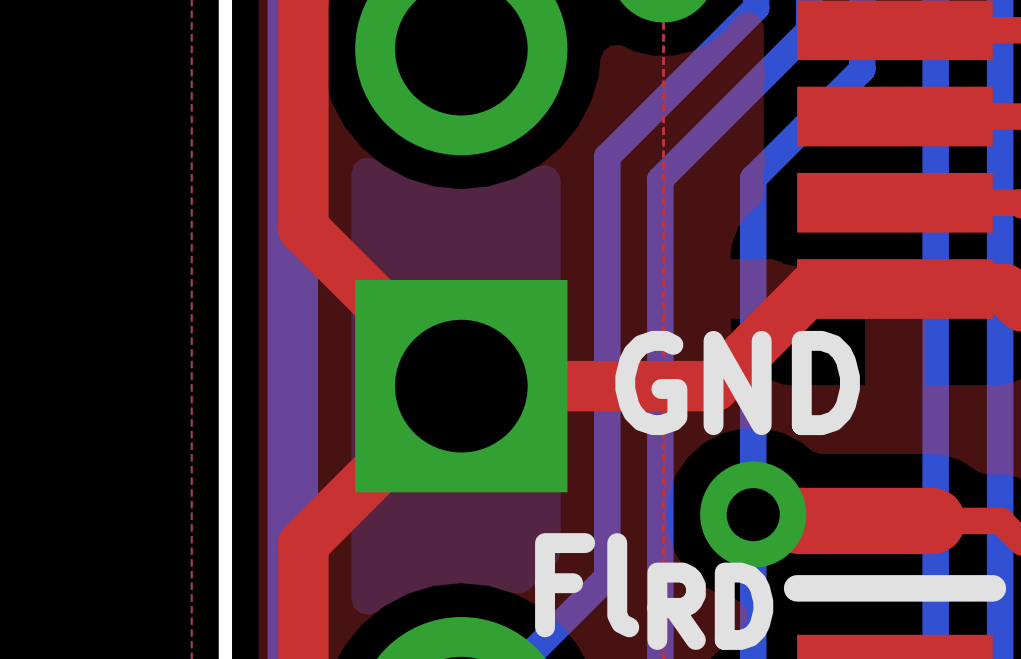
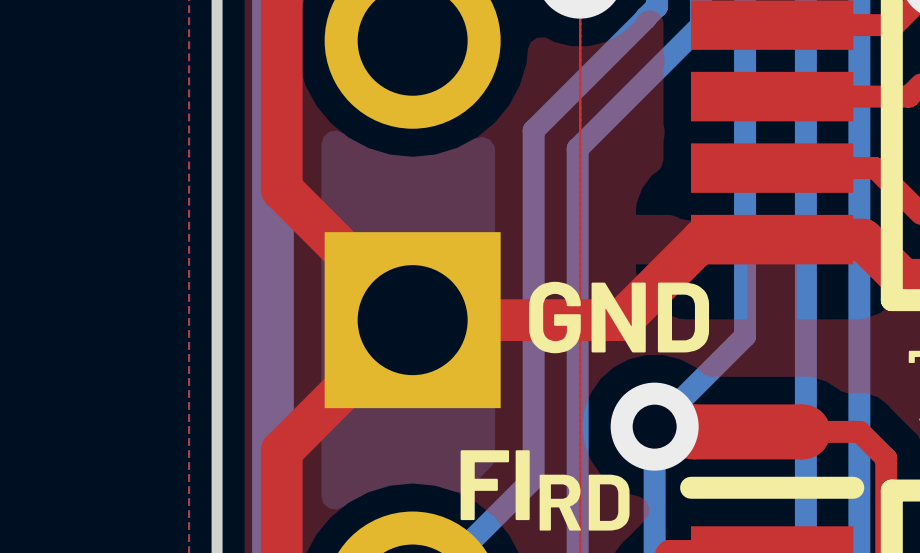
bottom track: (862, 69) (753, 178) (753, 514) -> (745, 57) (745, 336) (654, 426)

